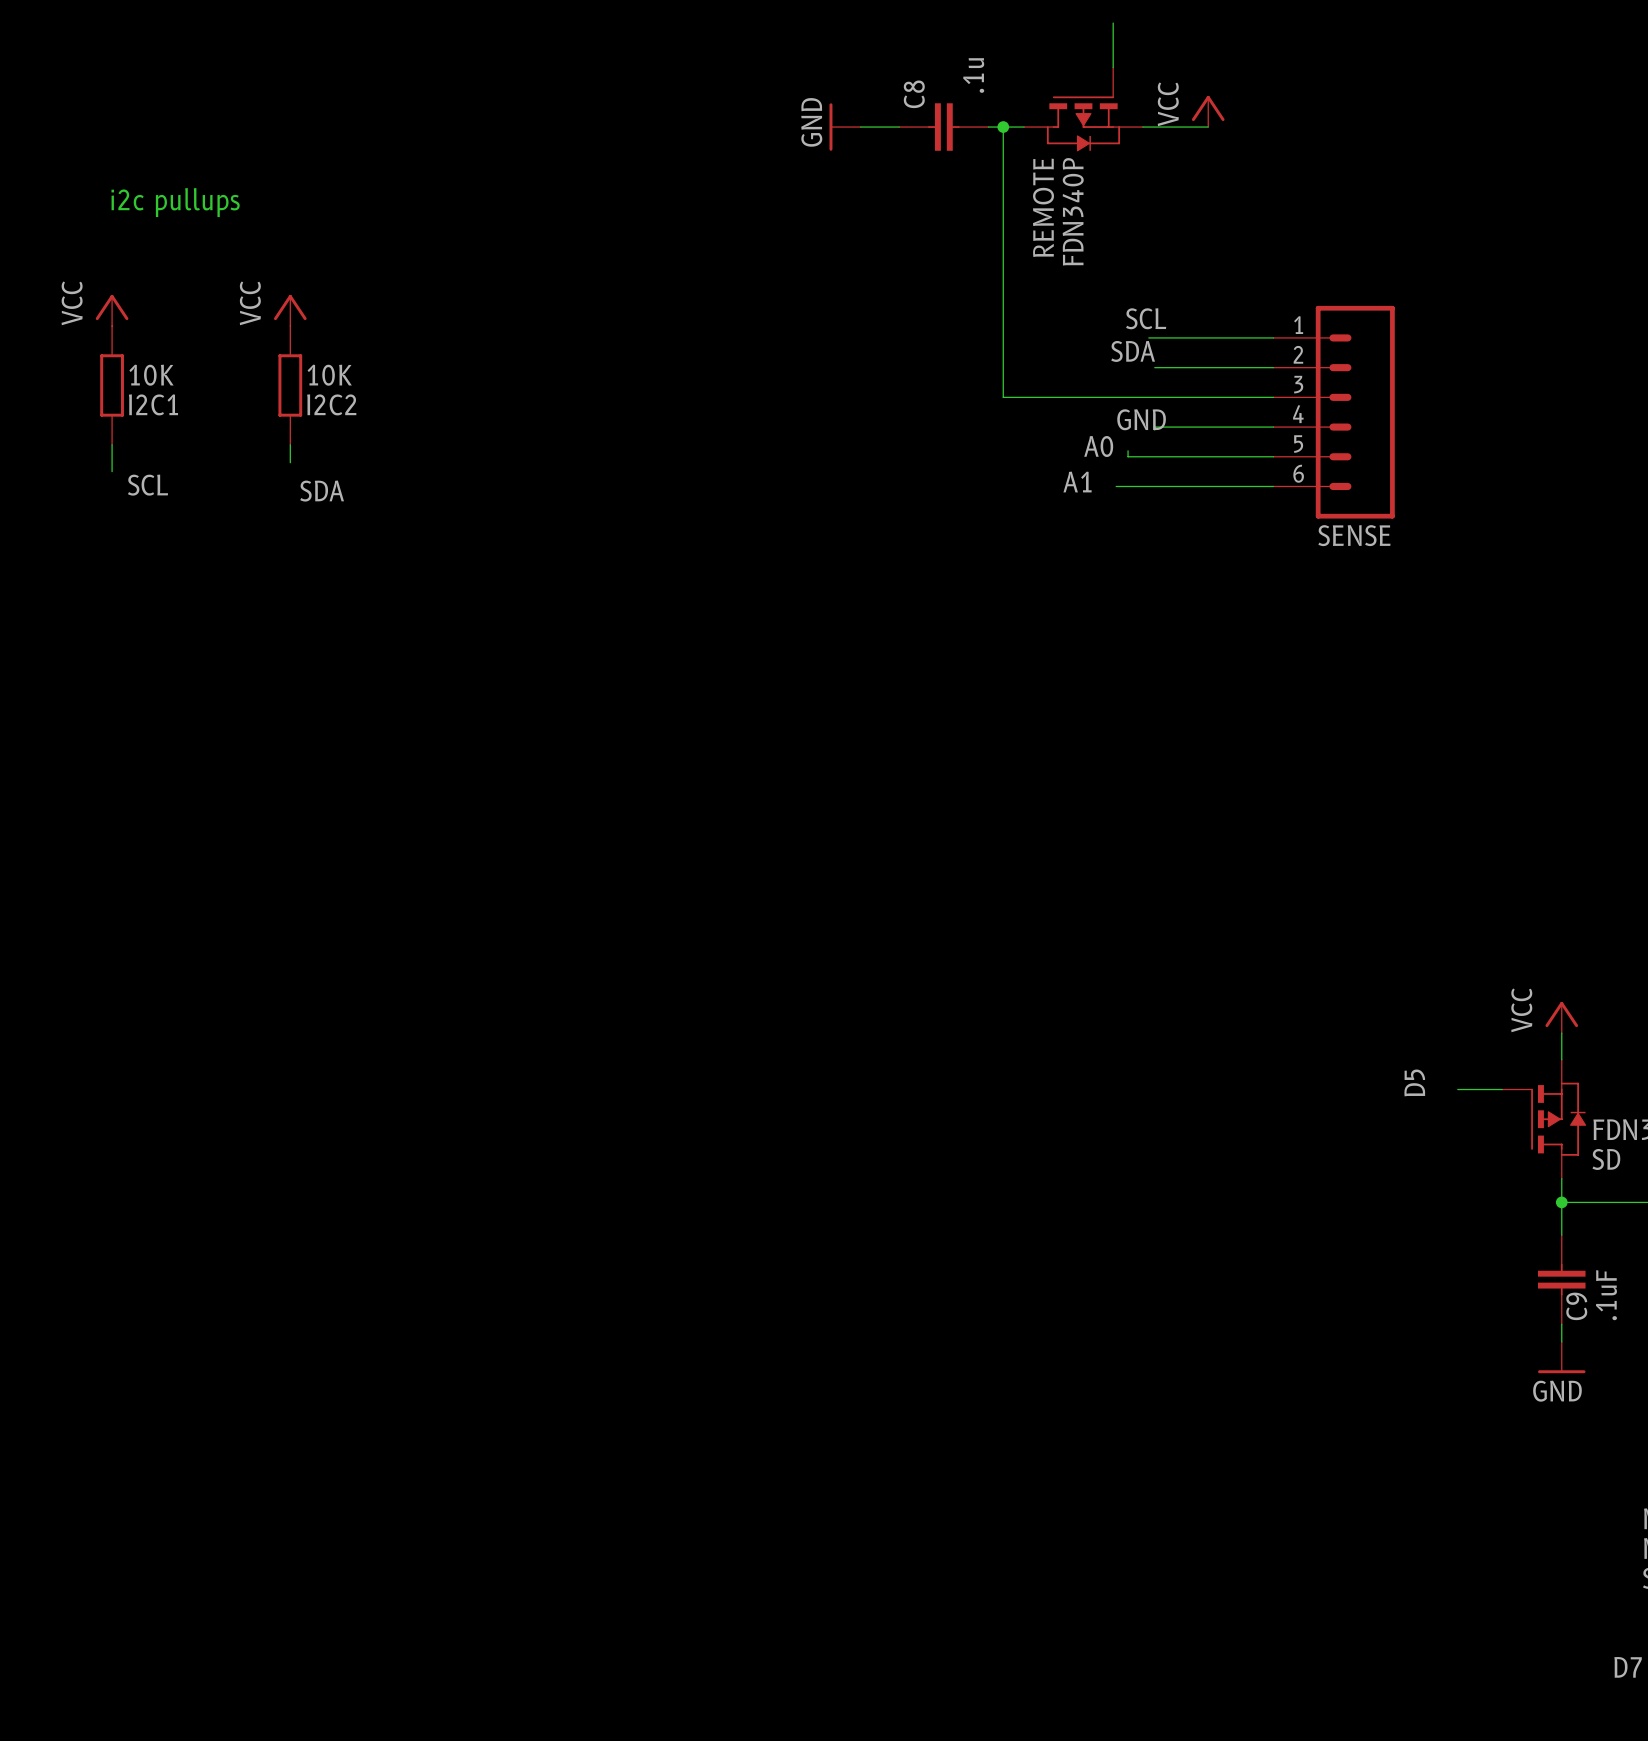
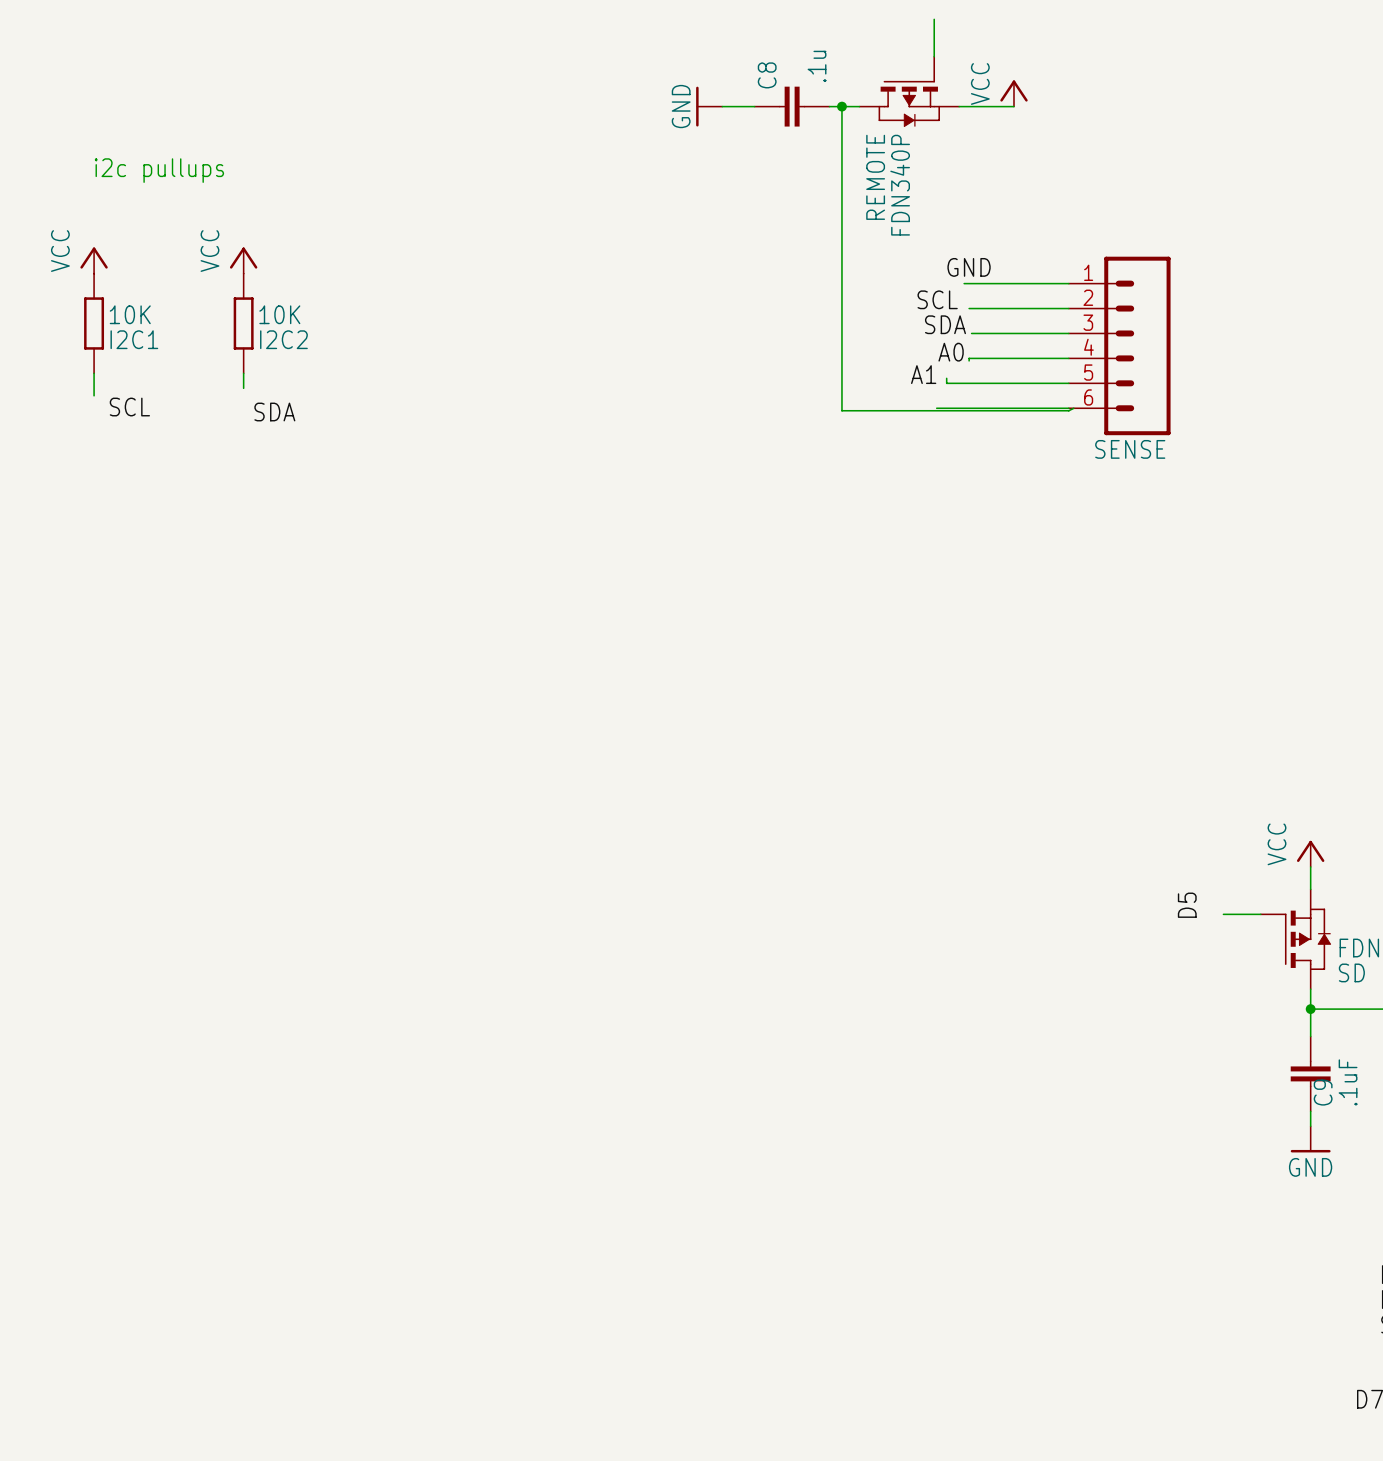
label: SCL (1146, 318) -> GND (969, 267)
label position: SDA (1133, 351) -> SDA (945, 324)
label: none -> SCL (937, 299)
wire: (1003, 397) (1157, 397) -> (841, 333) (841, 410) (1068, 410) (1073, 408)
label: GND (1141, 419) -> A0 (951, 352)
label: A0 (1098, 446) -> A1 (923, 374)
label: A1 (1077, 482) -> none

